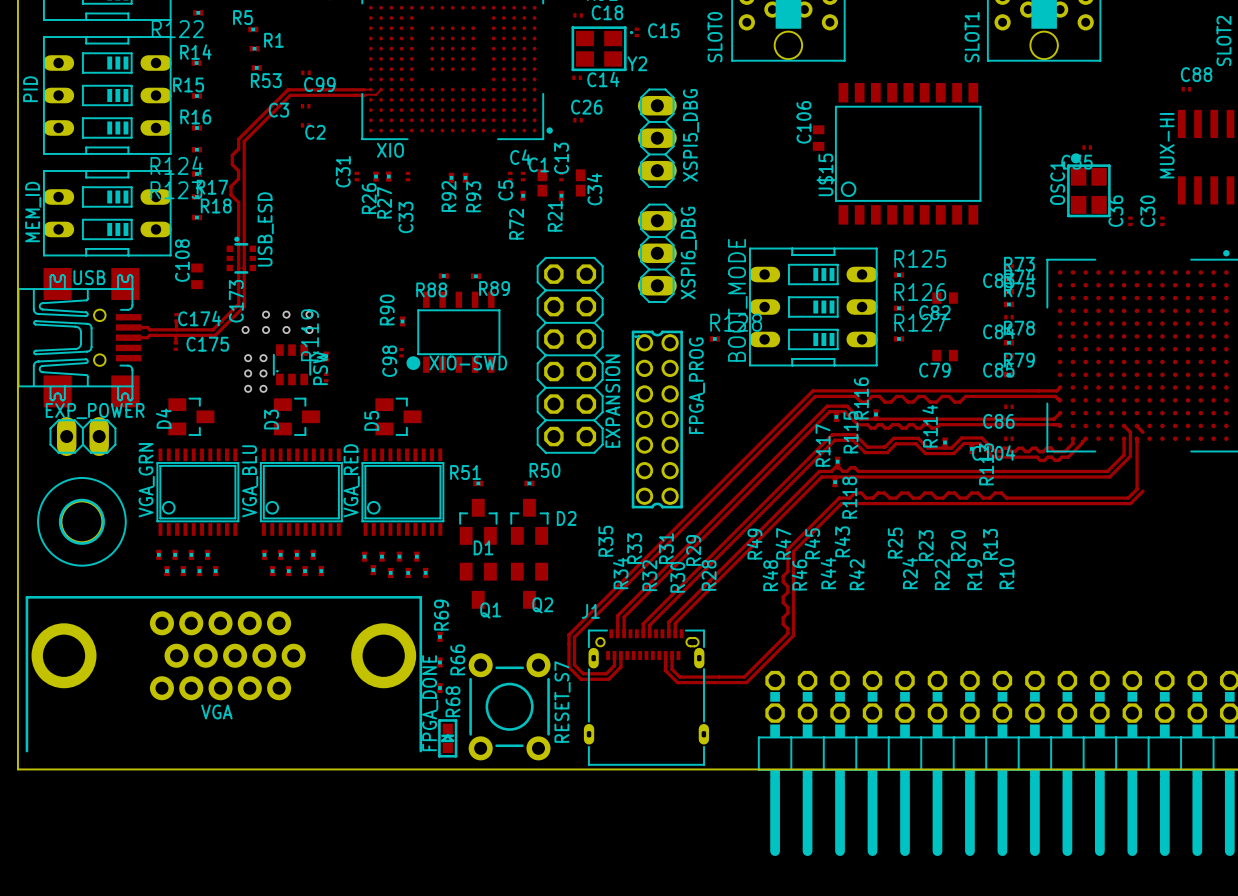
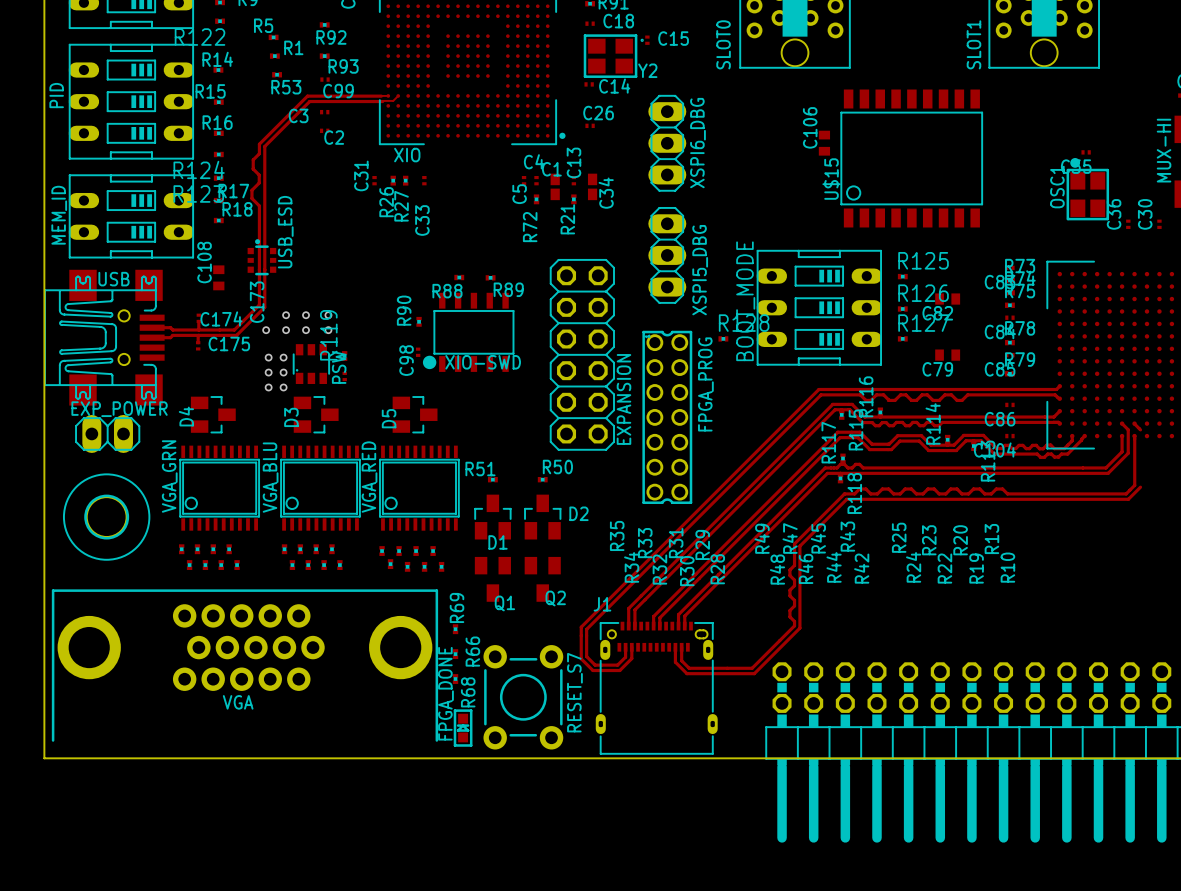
XSPI5_DBG name: XSPI5_DBG (691, 135) -> XSPI6_DBG (697, 143)
R92 rotation: 0° (451, 177) -> 90° clockwise (324, 24)
R92 position: (451, 177) -> (324, 24)
R93 rotation: 0° (465, 177) -> 90° clockwise (324, 56)
R93 position: (465, 177) -> (324, 56)
XSPI6_DBG name: XSPI6_DBG (688, 253) -> XSPI5_DBG (700, 270)

